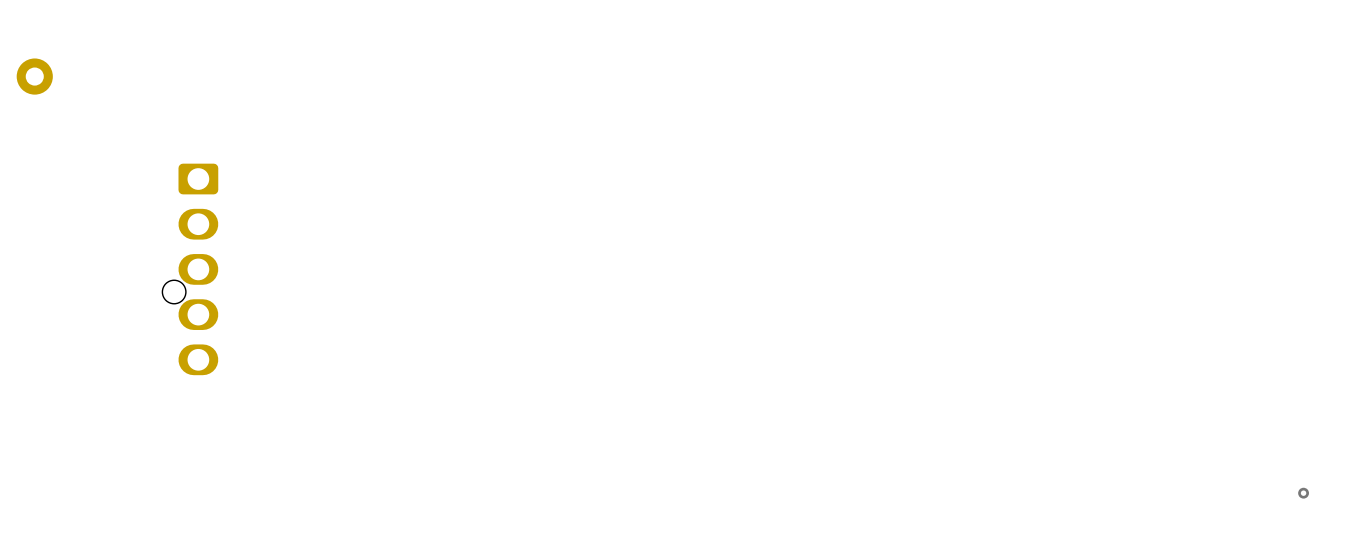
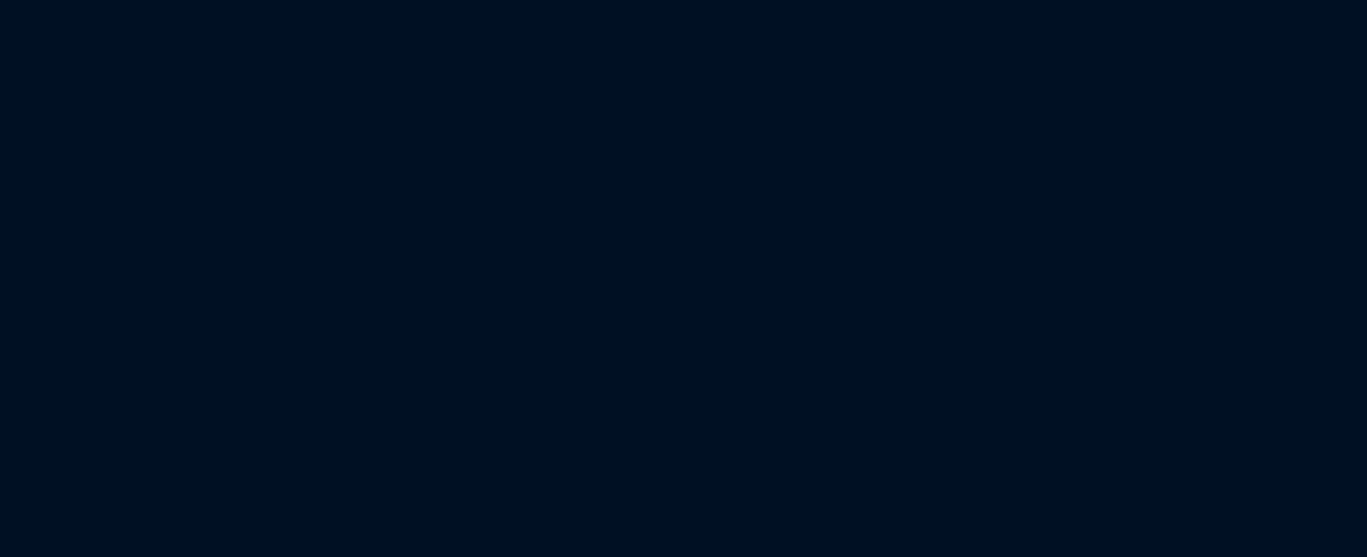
part: (34, 76) -> none
part: (190, 269) -> none
via: (1303, 493) -> none

